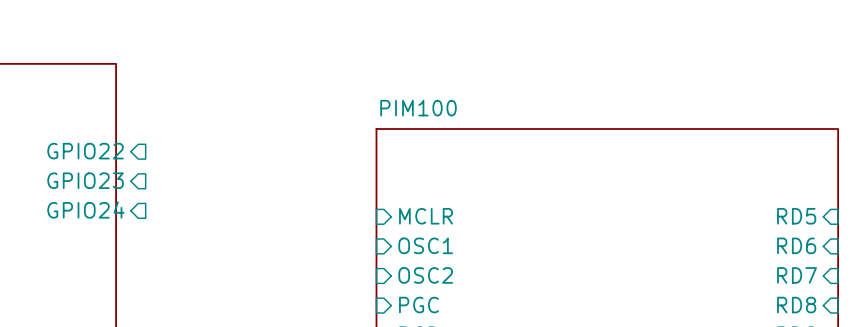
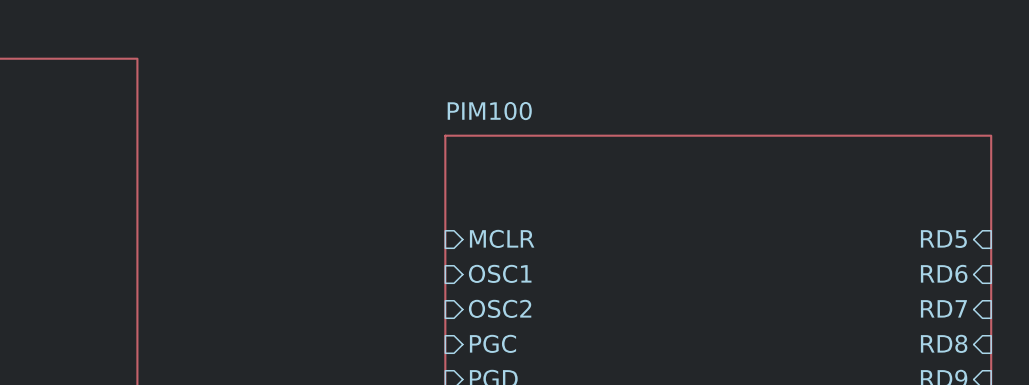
sheet pin: GPIO22 (85, 151) -> none
sheet pin: GPIO23 (85, 180) -> none
sheet pin: GPIO24 (85, 209) -> none

